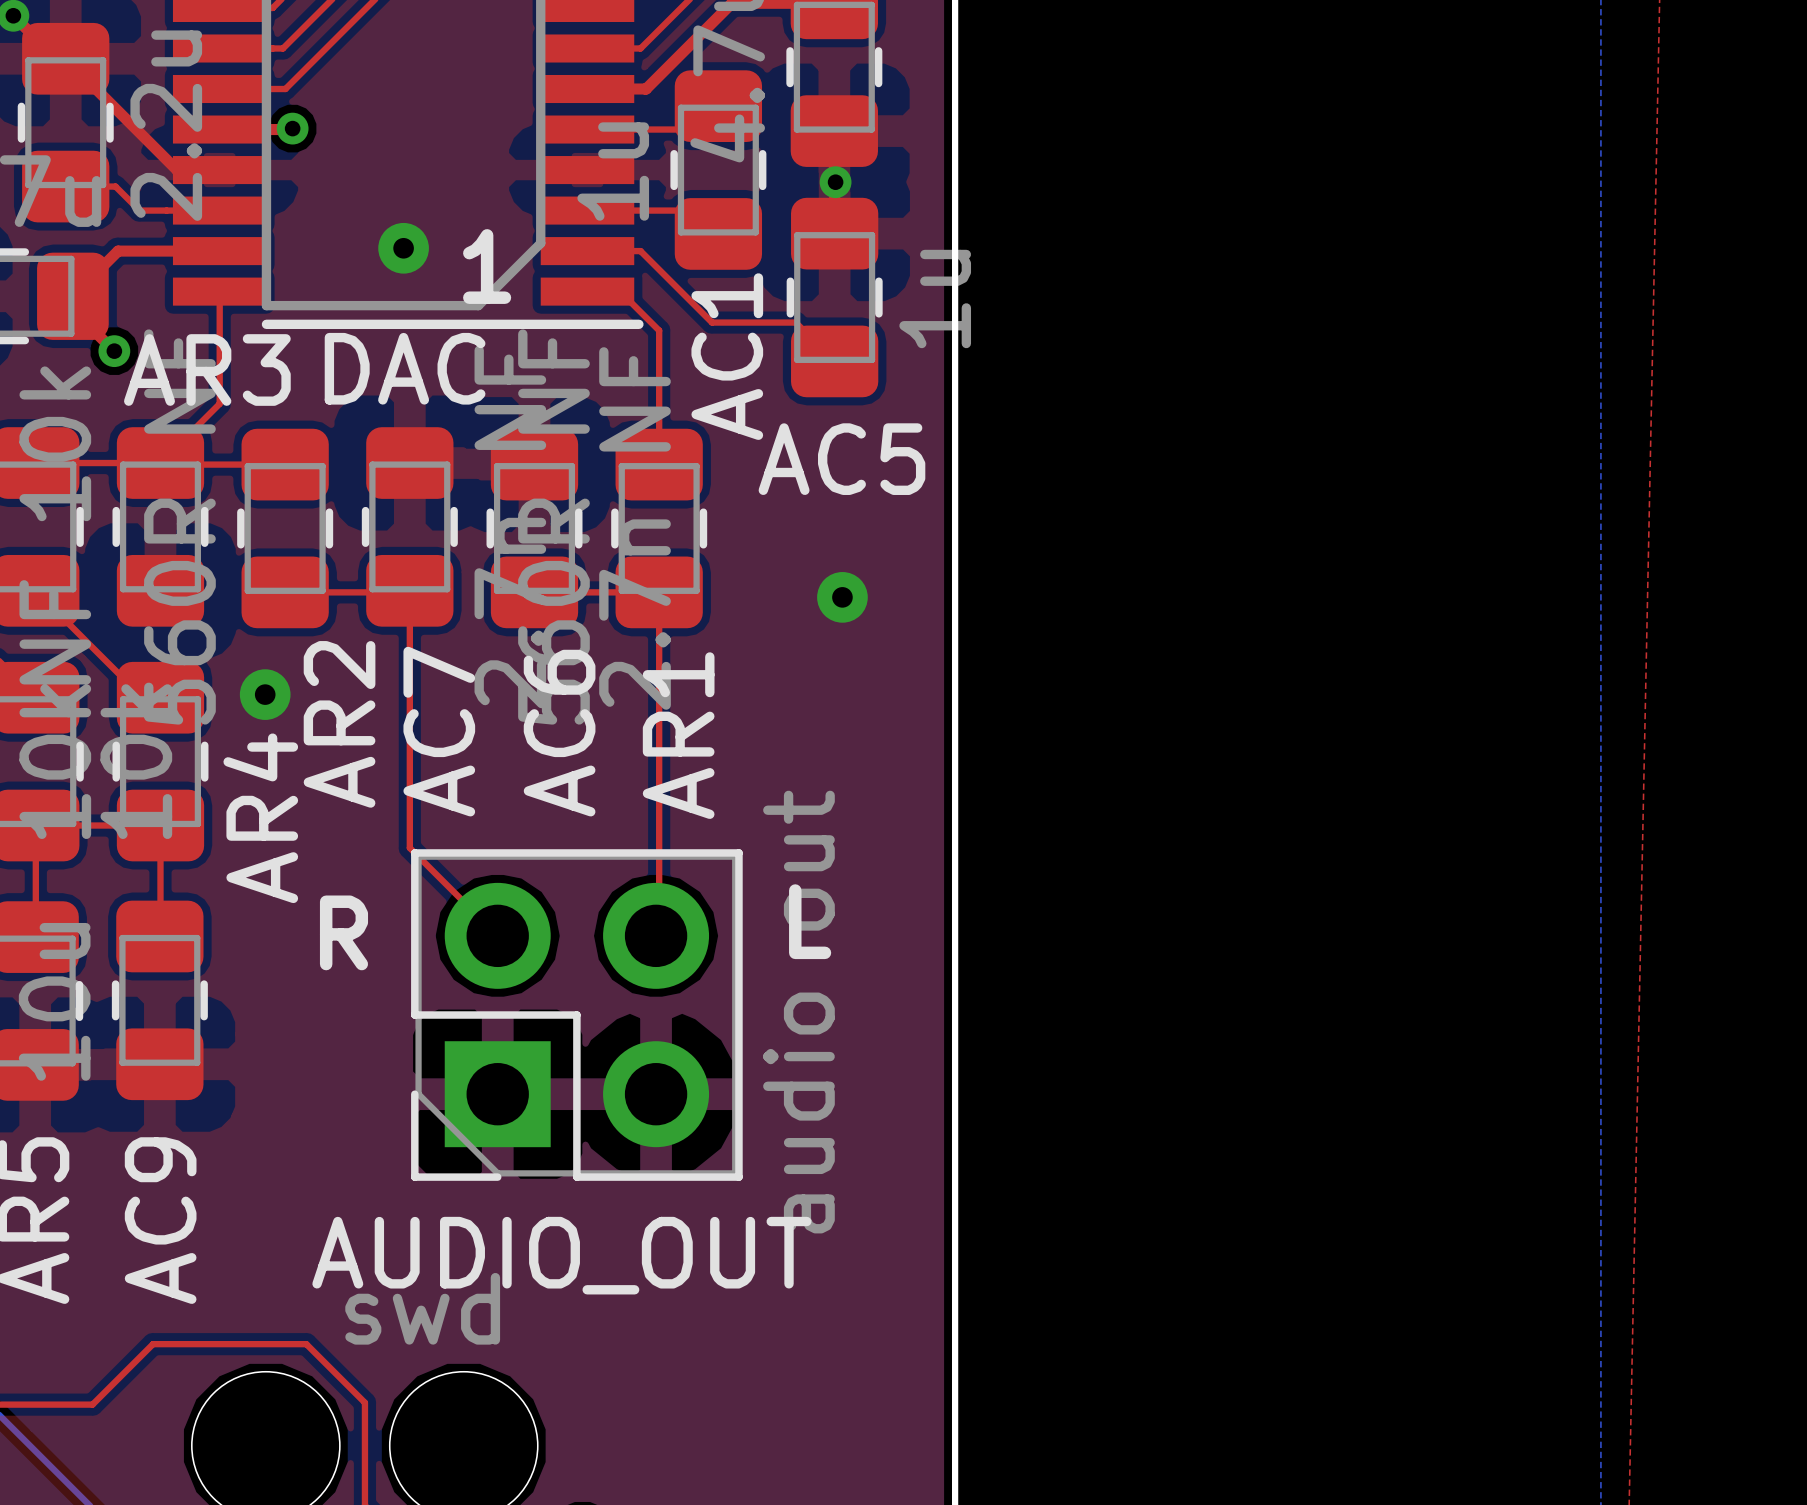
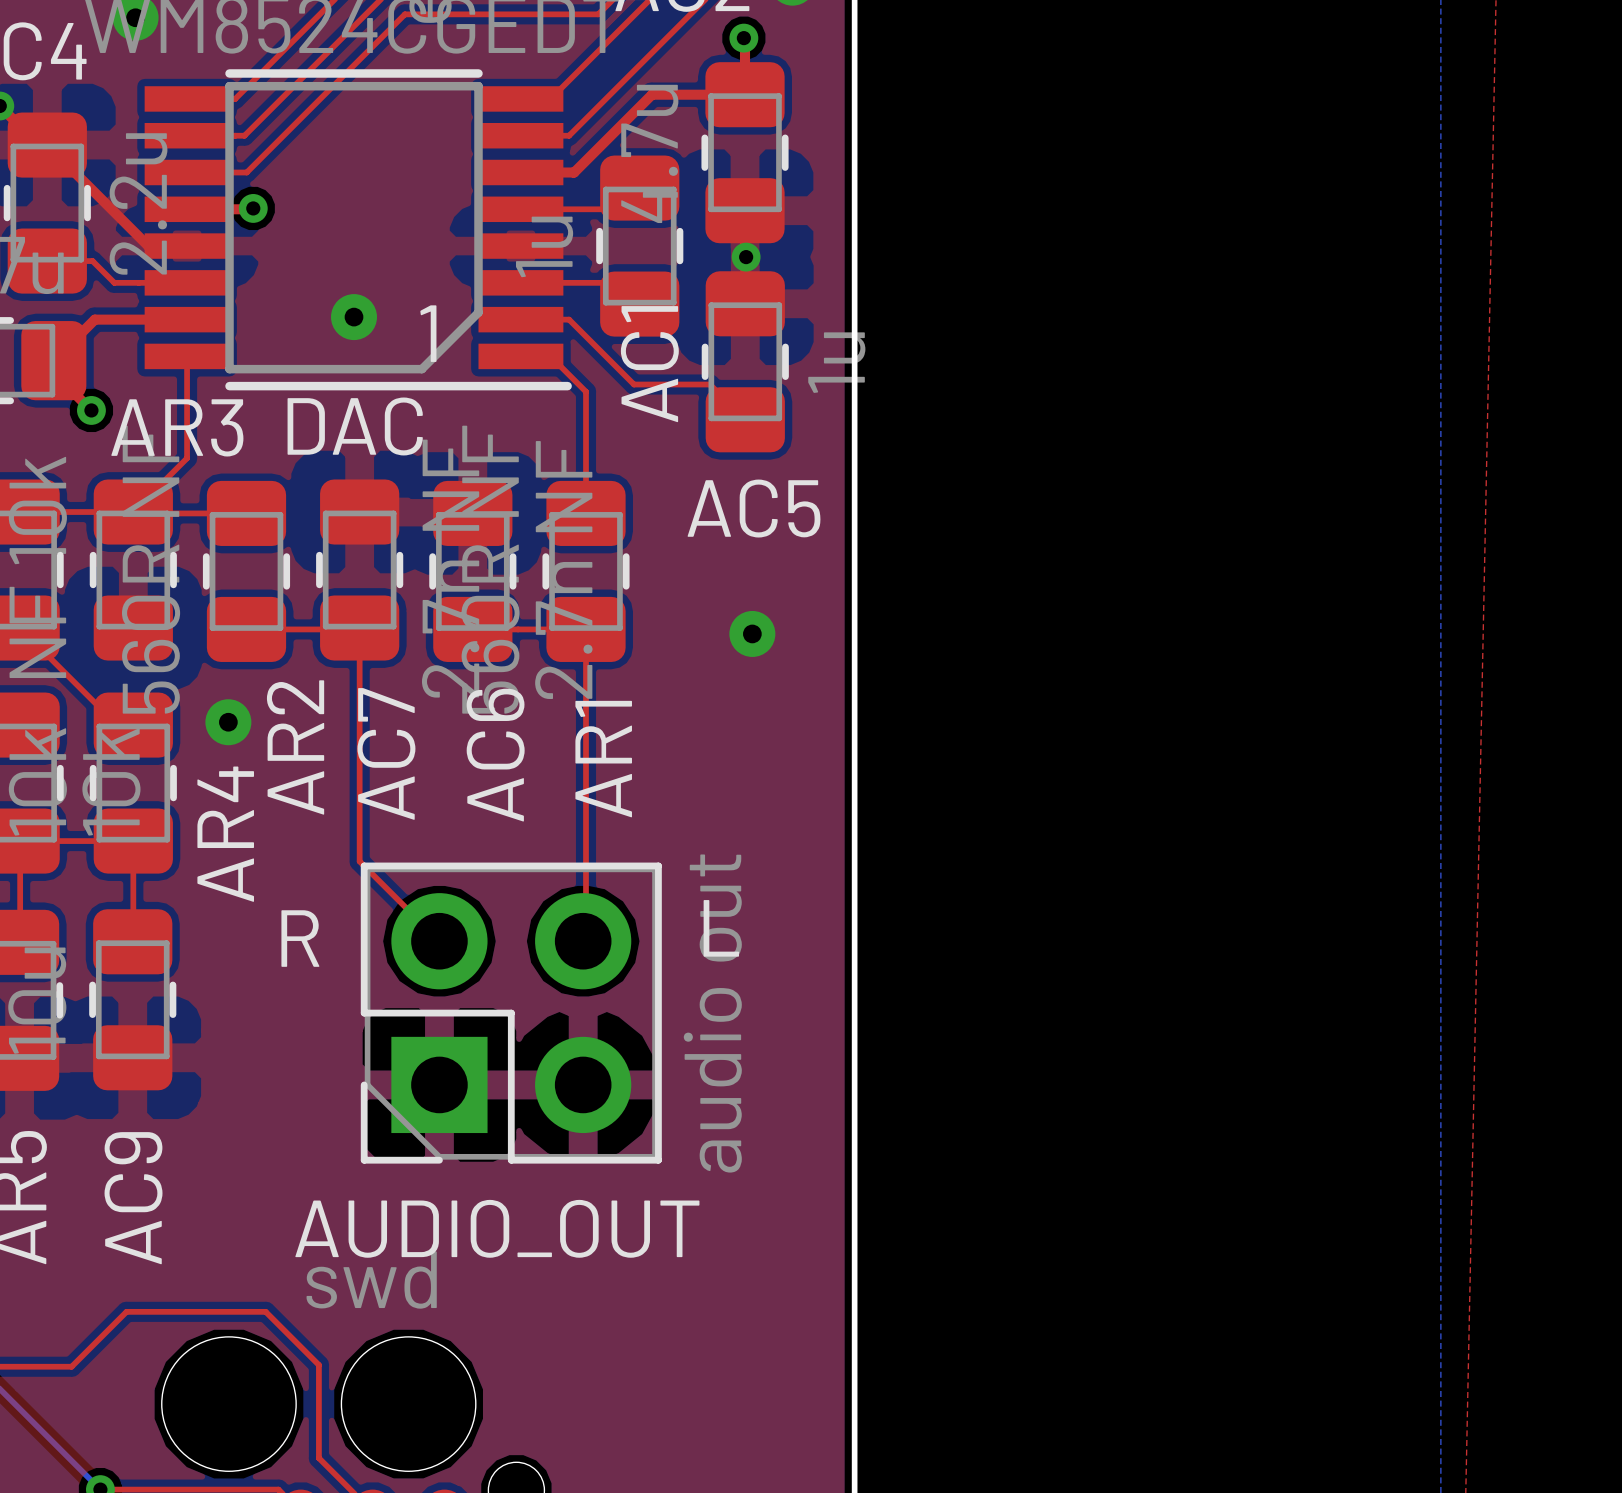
AC1 name position: AC1 (727, 356) -> AC1 (649, 364)

